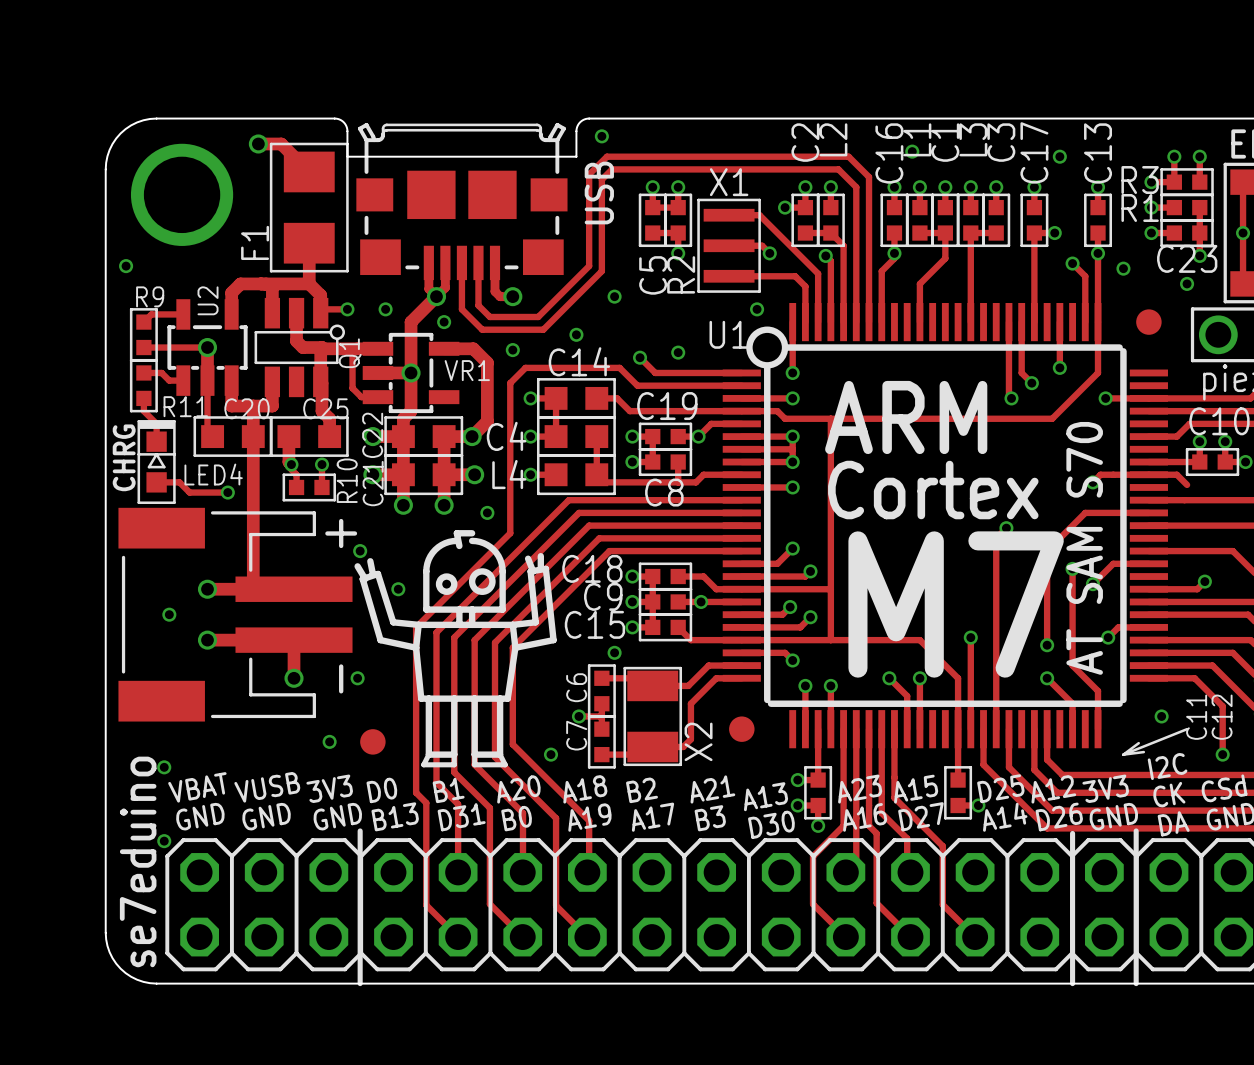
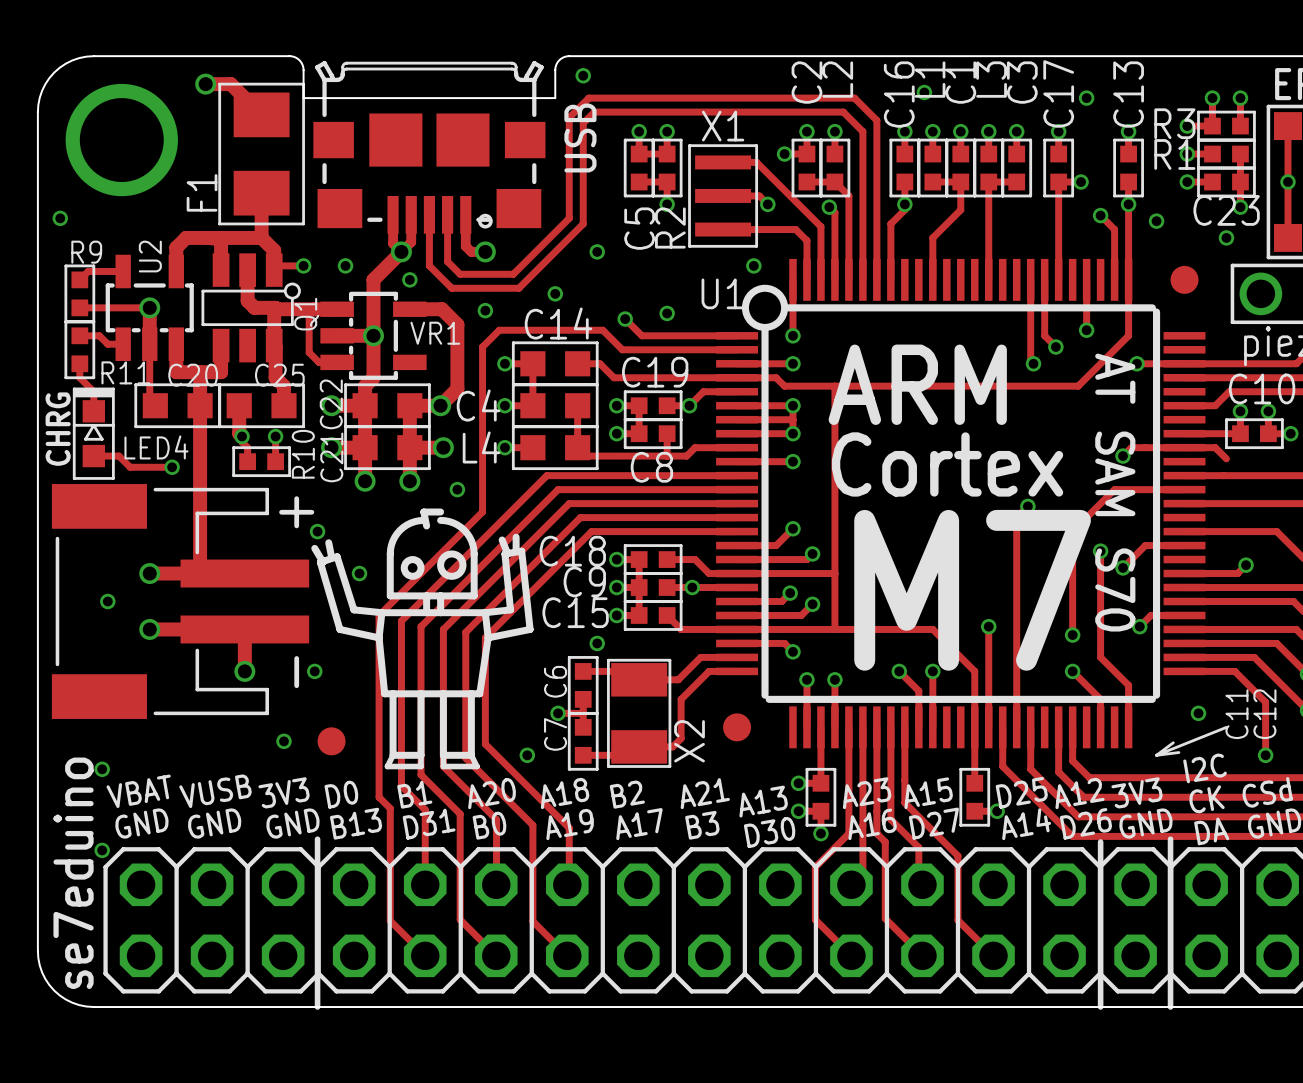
part footprint: [356, 122, 568, 281] -> [313, 61, 546, 234]
text rotation: 0° (1084, 548) -> 180° (1115, 492)

